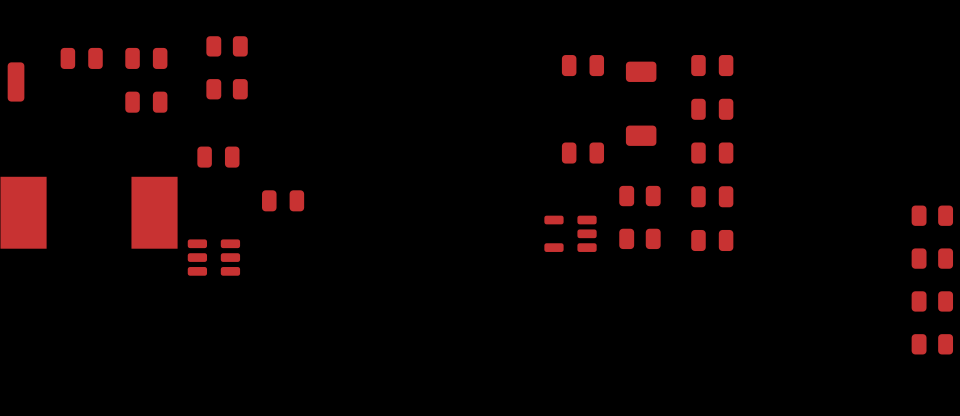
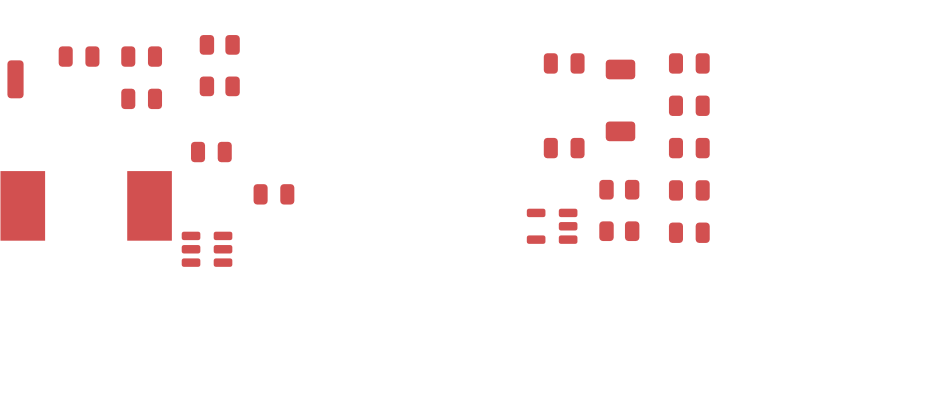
part: (932, 215) -> none
part: (932, 258) -> none
part: (932, 301) -> none
part: (932, 344) -> none

